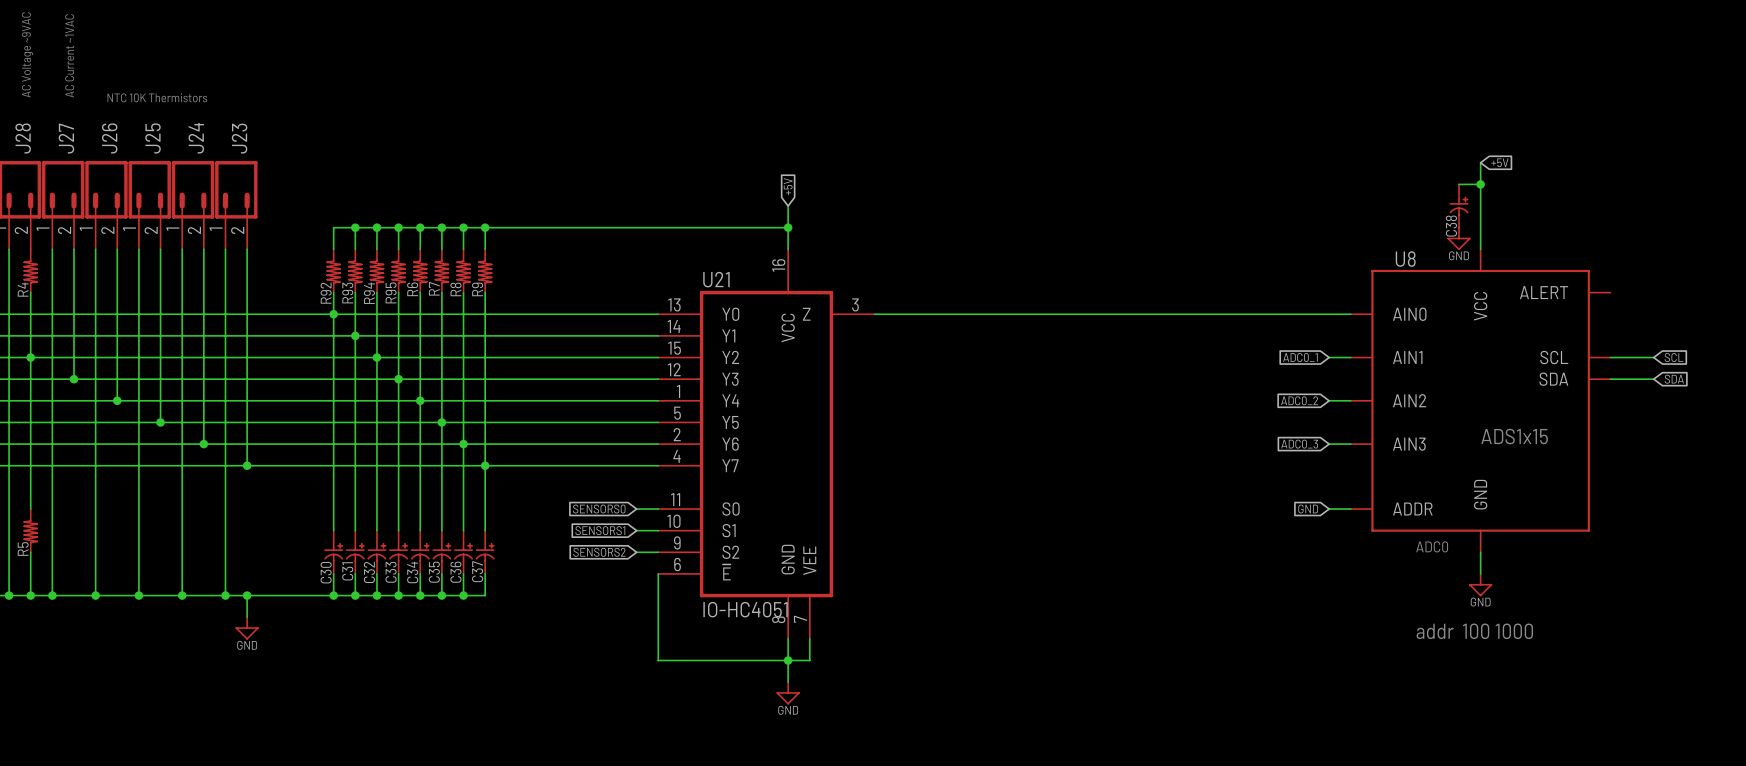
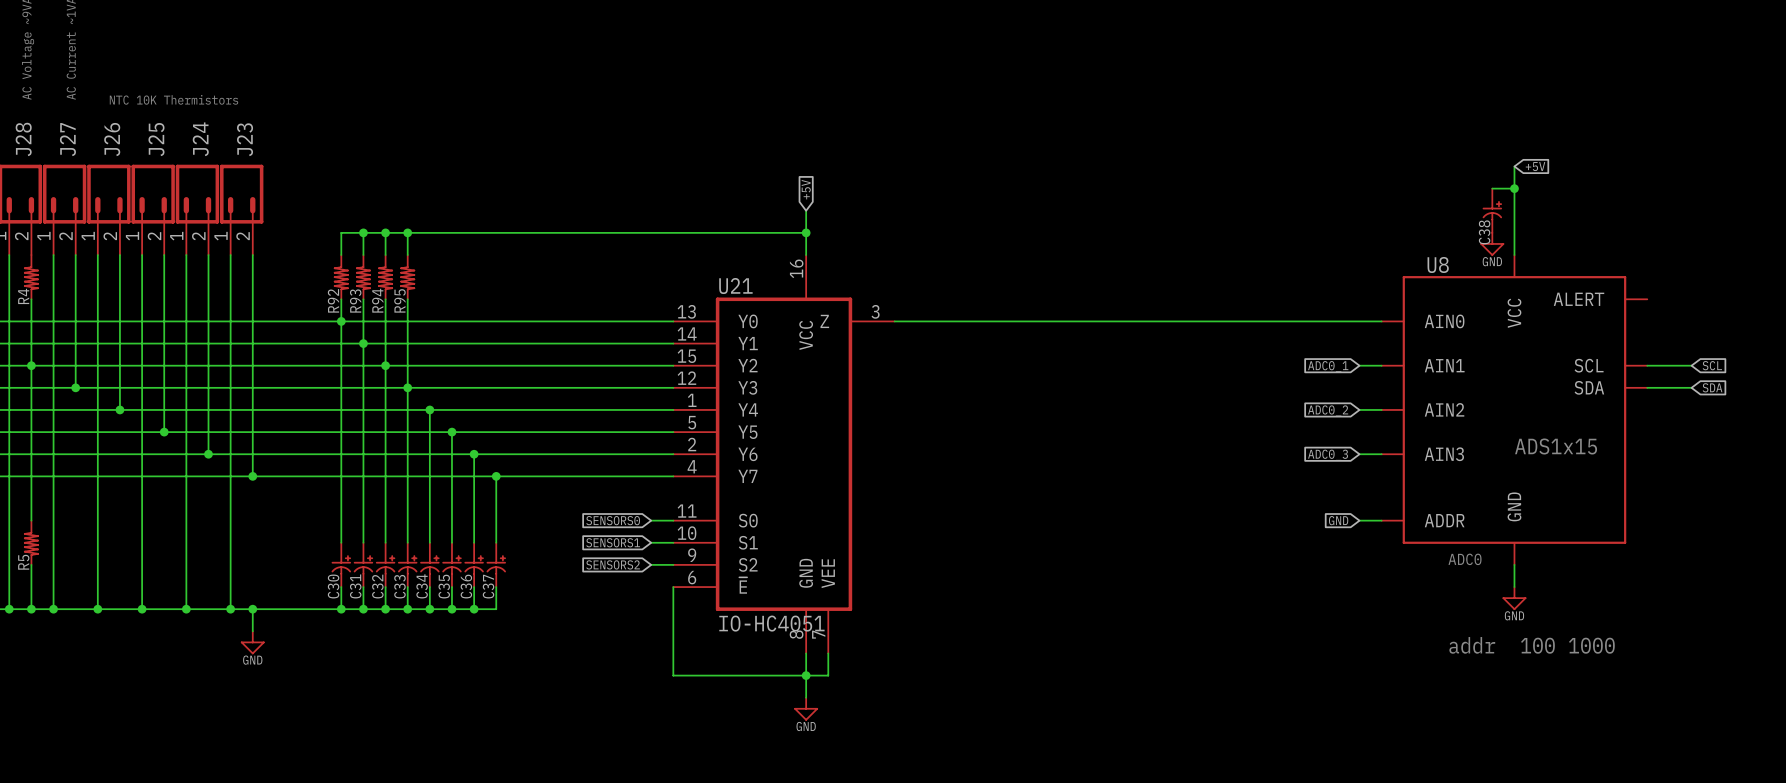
wire: (420, 227) (420, 249) -> none
junction: (420, 227) -> none
wire: (441, 227) (441, 249) -> none
junction: (441, 227) -> none
wire: (463, 227) (463, 249) -> none
junction: (463, 227) -> none
wire: (485, 227) (485, 249) -> none
junction: (485, 227) -> none
R6: (420, 270) -> none
R7: (441, 270) -> none
R8: (463, 270) -> none
R9: (485, 270) -> none
wire: (420, 292) (420, 400) -> none
wire: (441, 292) (441, 422) -> none
wire: (463, 292) (463, 444) -> none
wire: (485, 292) (485, 465) -> none

